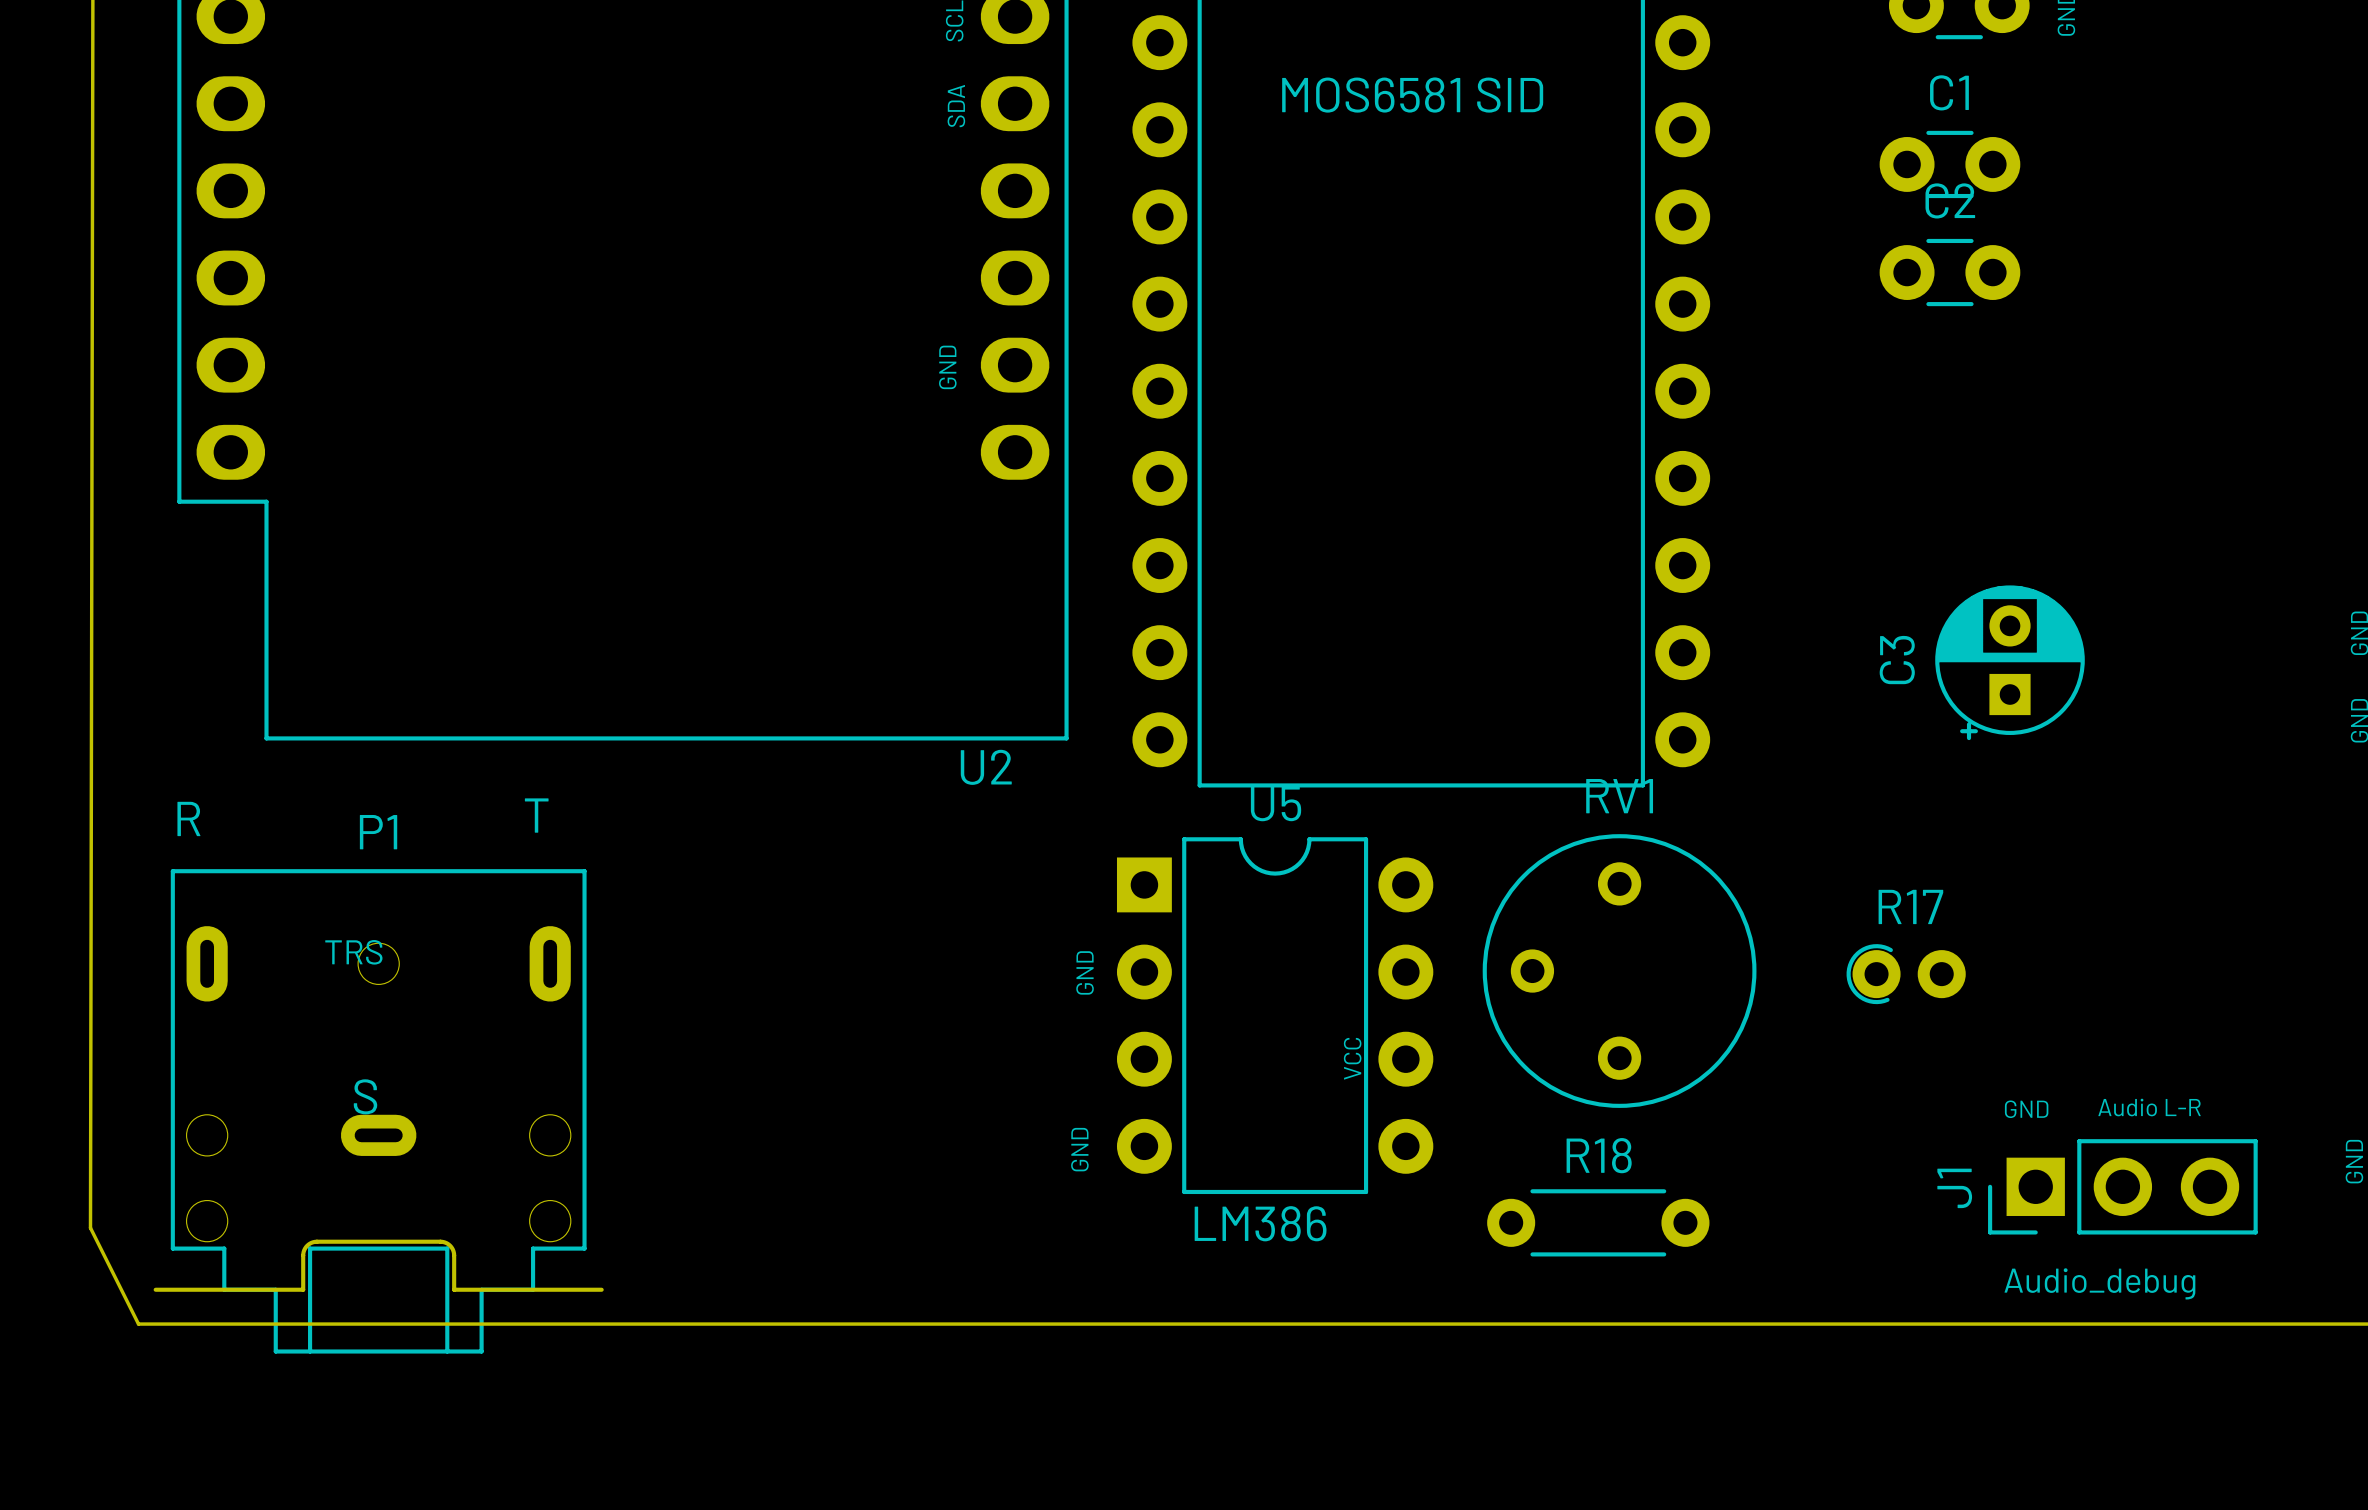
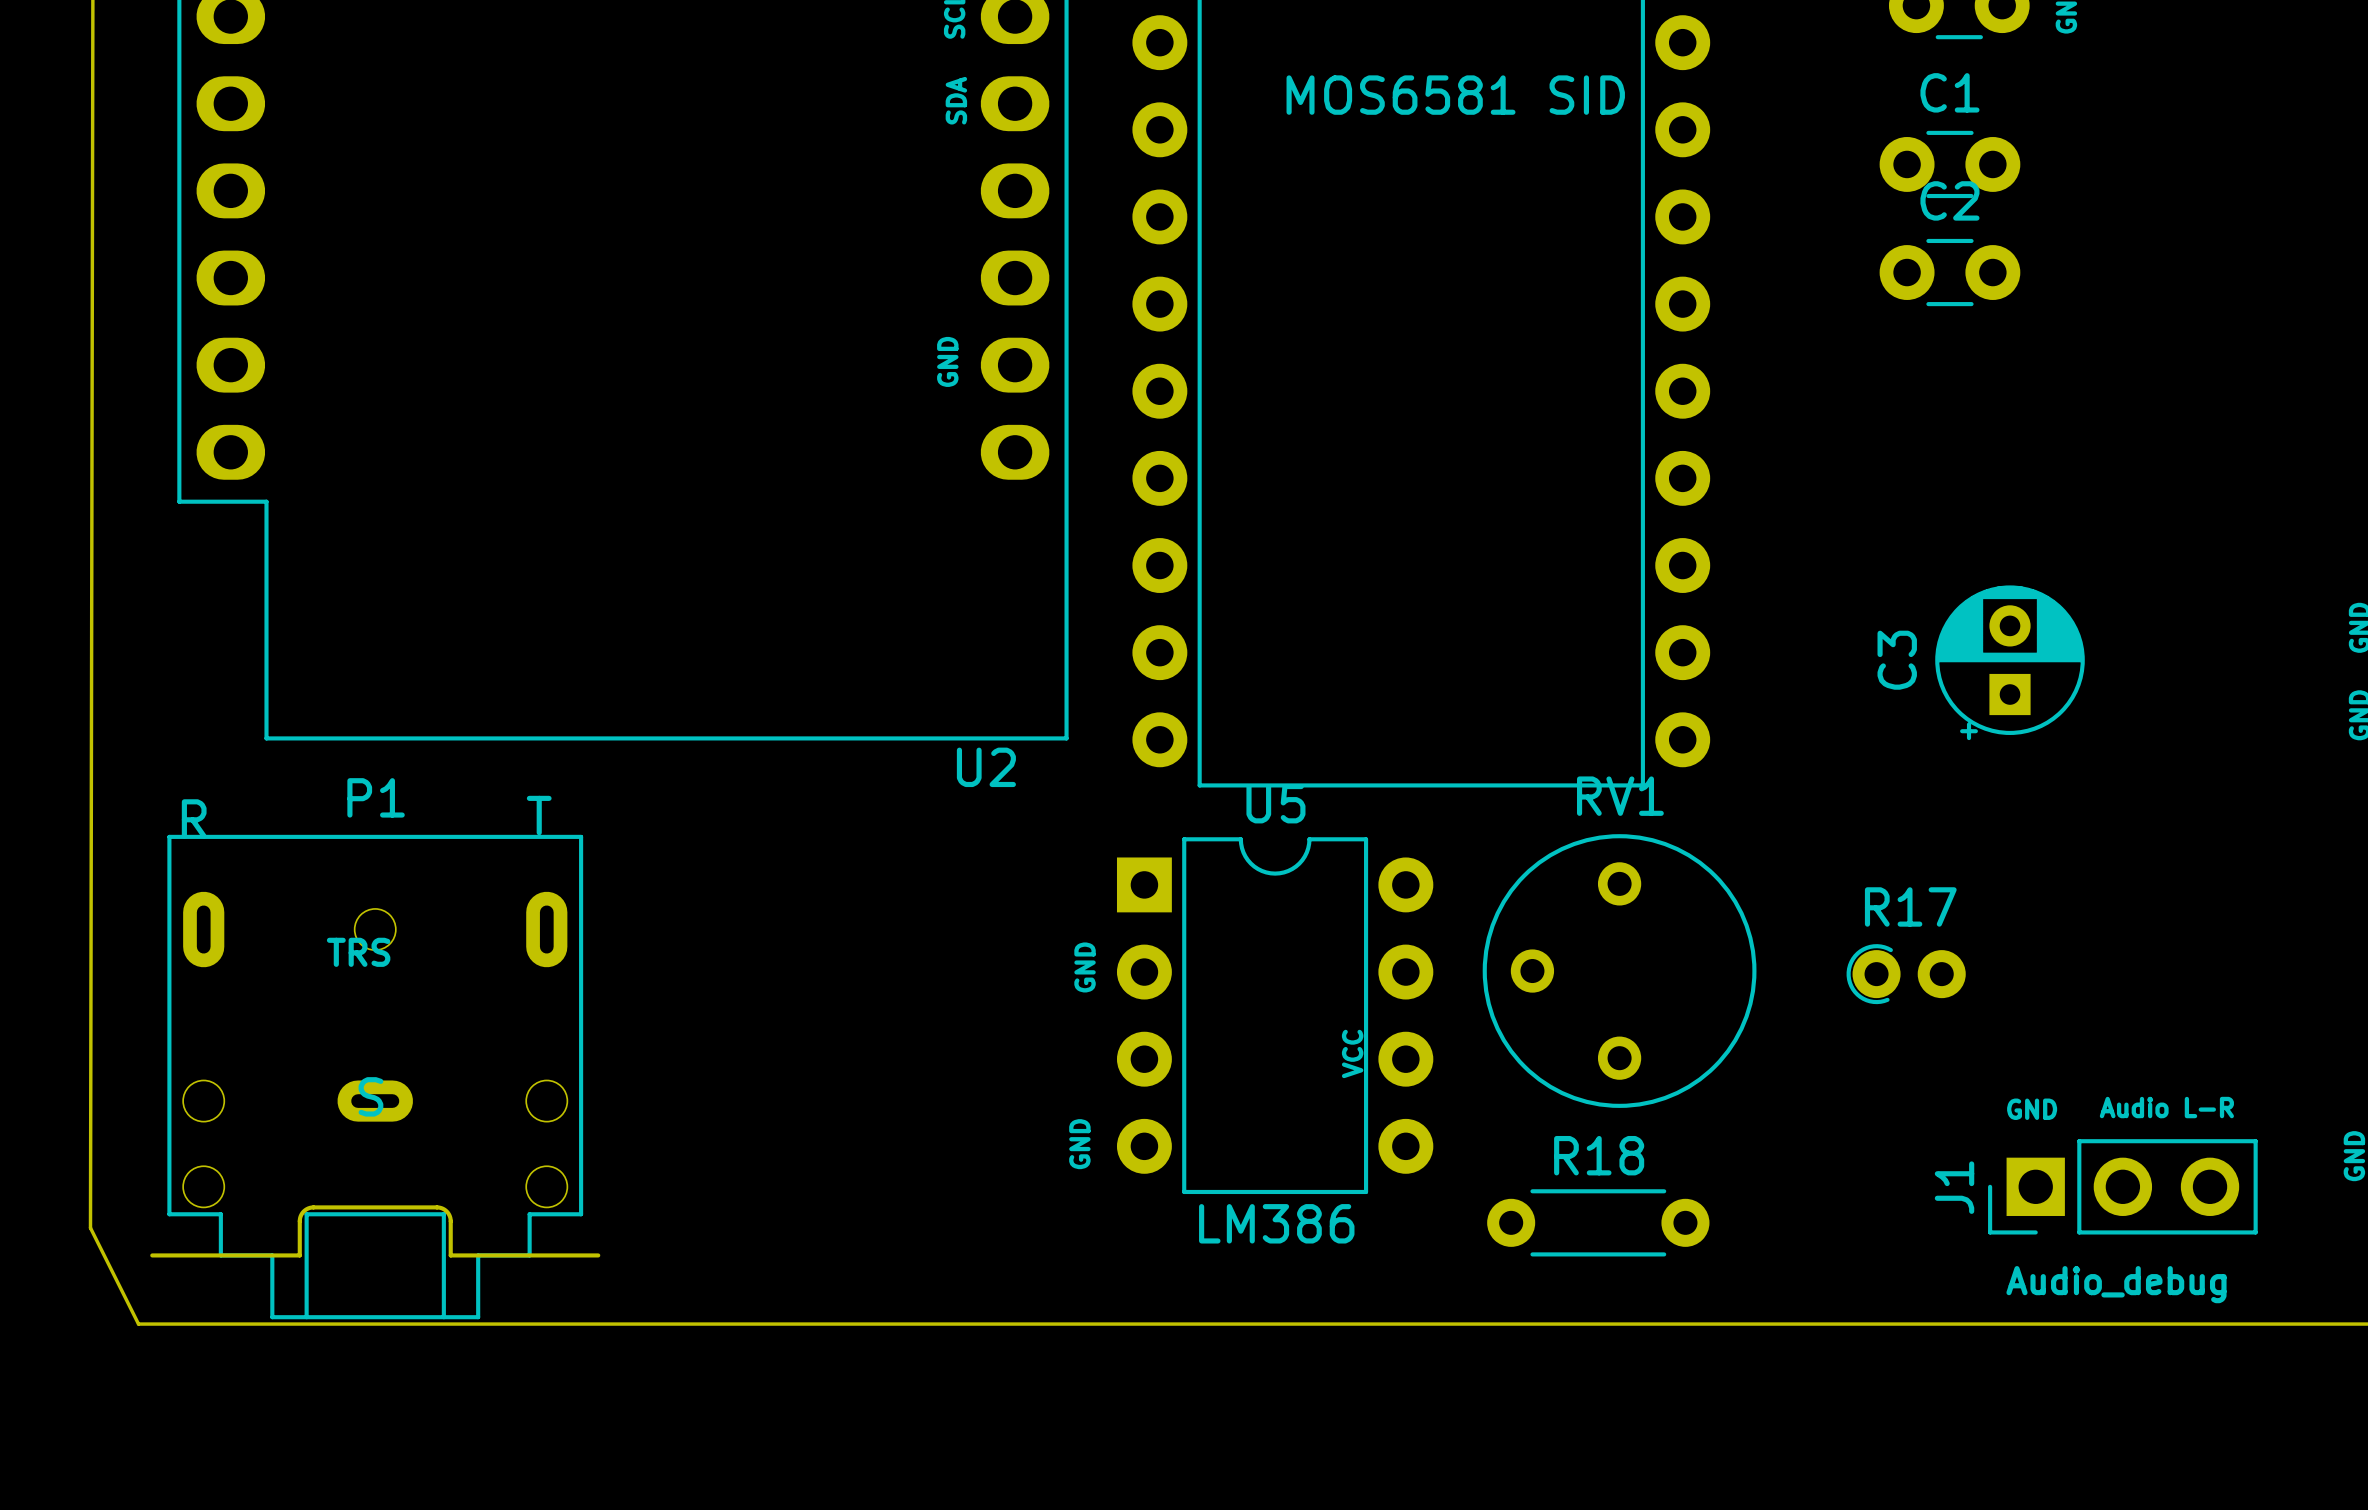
P1 position: (378, 1111) -> (375, 1077)

